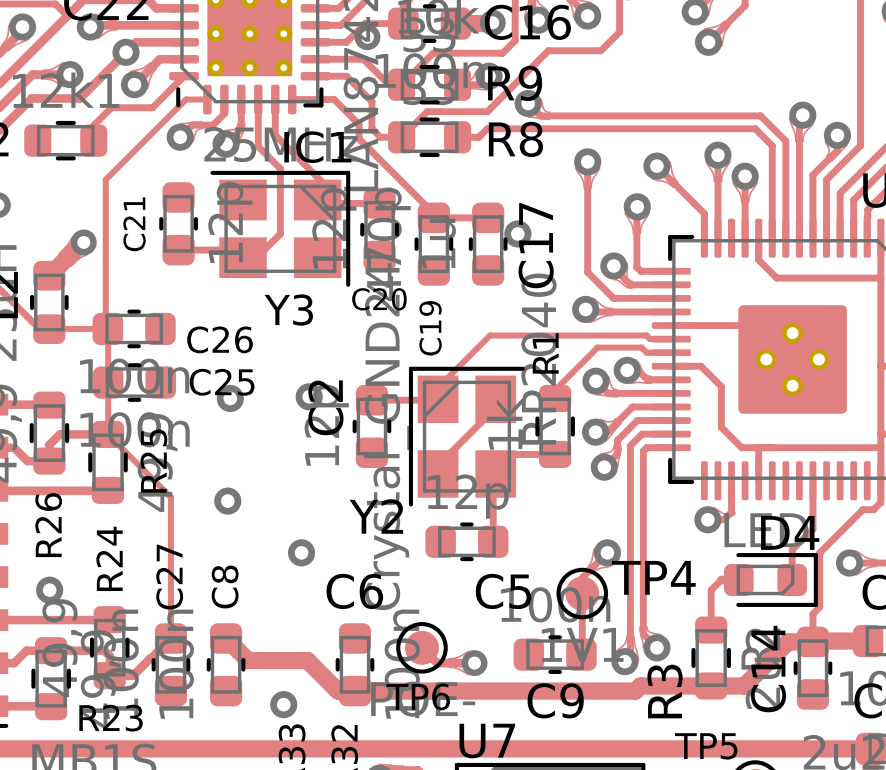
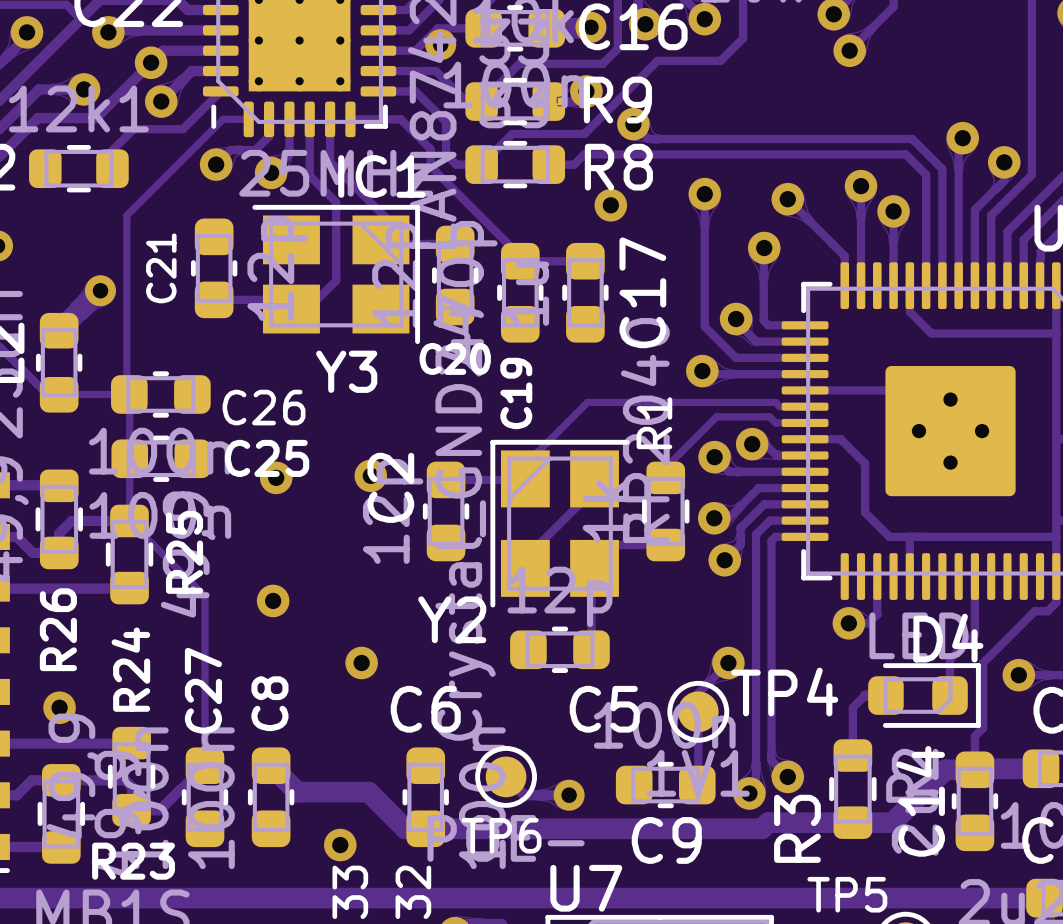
via position: (517, 233) -> (610, 205)

